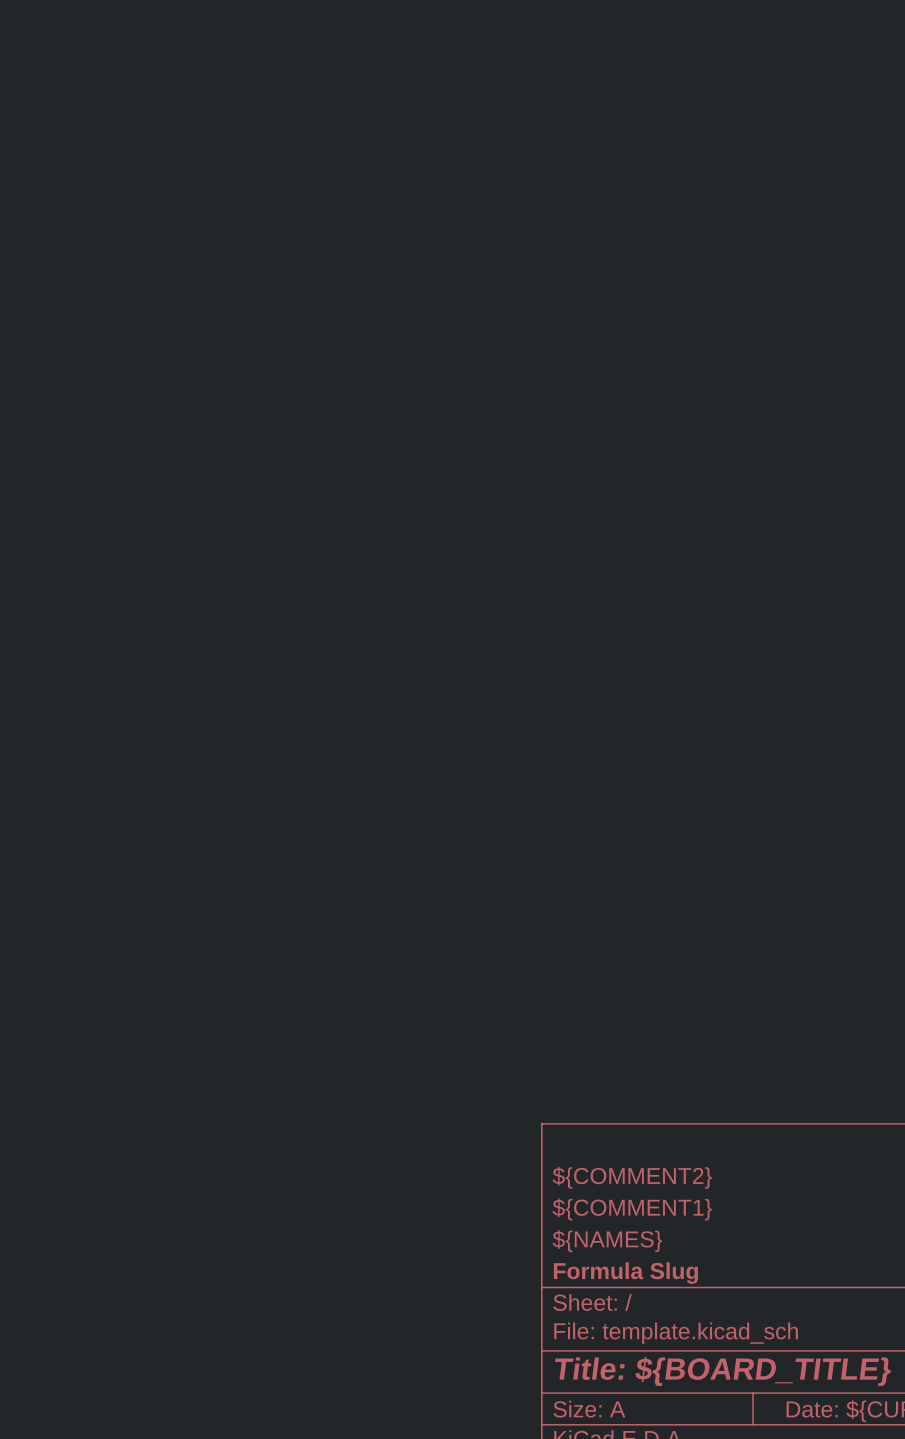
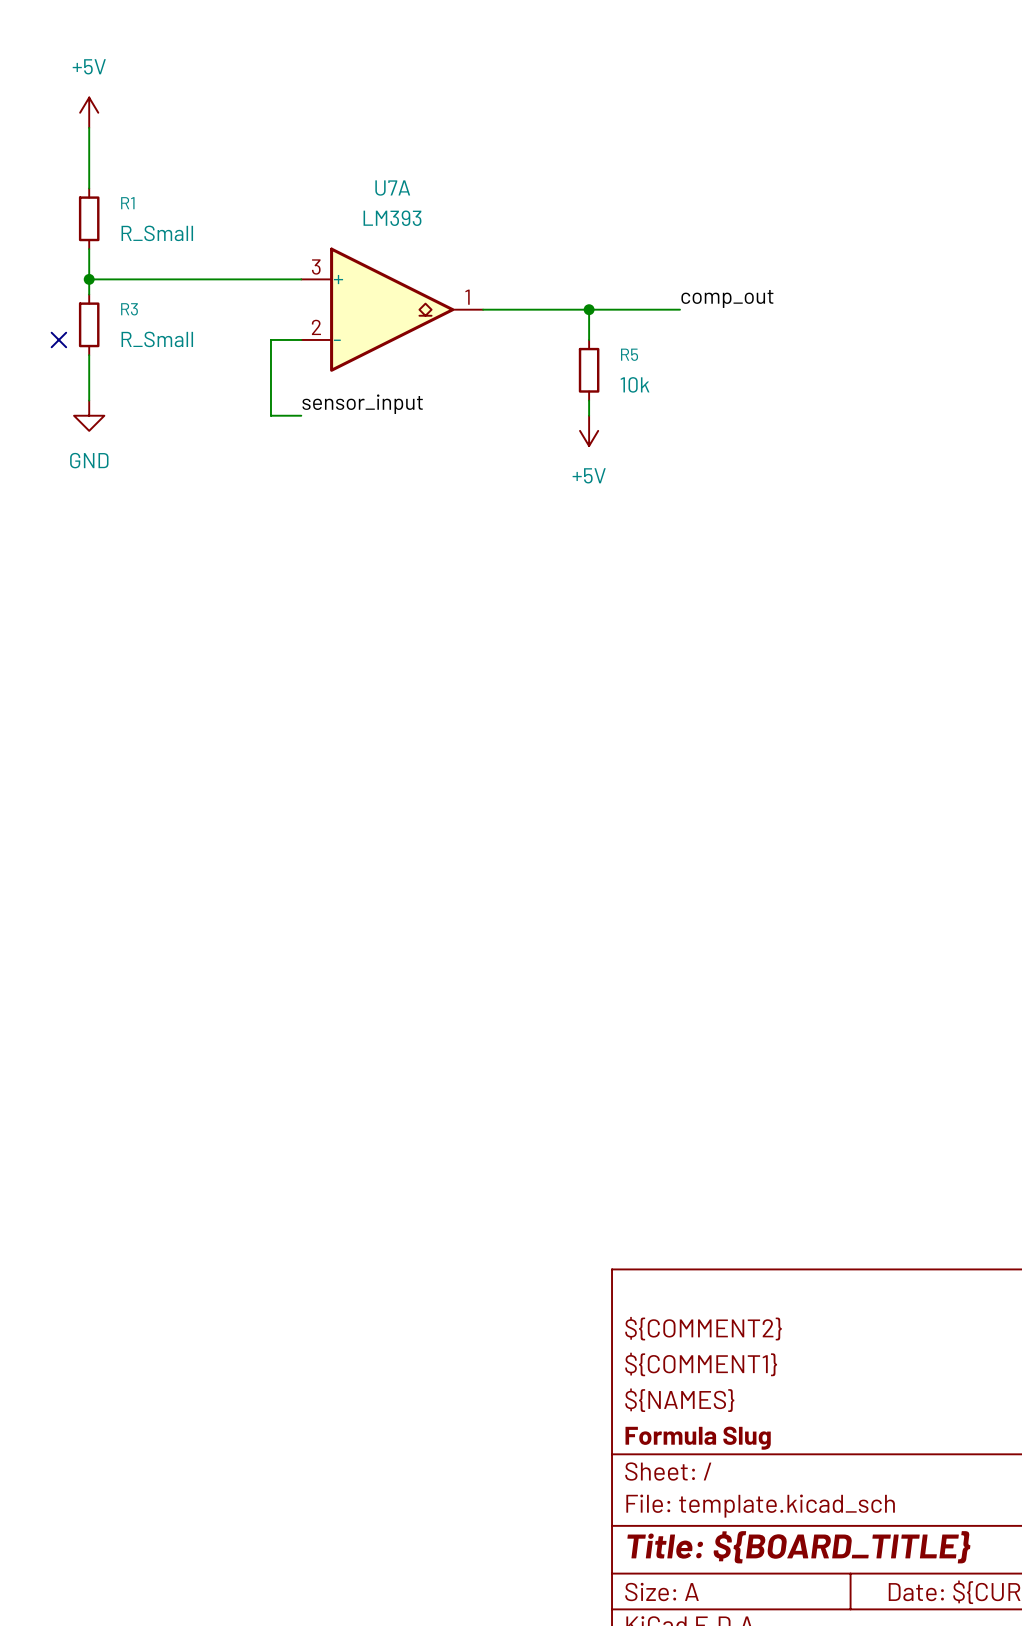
power symbol: none -> +5V (89, 112)
wire: none -> (89, 127) (89, 188)
R1: none -> R_Small (89, 218)
wire: none -> (89, 249) (89, 294)
wire: none -> (89, 279) (301, 279)
junction: none -> (89, 279)
label: none -> comp_out (727, 298)
U7A: none -> LM393 (392, 309)
wire: none -> (483, 309) (680, 309)
wire: none -> (589, 309) (589, 339)
junction: none -> (589, 309)
R3: none -> R_Small (89, 324)
no-connect mark: none -> (58, 339)
wire: none -> (301, 339) (270, 339) (270, 415) (301, 415)
wire: none -> (89, 355) (89, 400)
R5: none -> 10k (589, 370)
wire: none -> (589, 400) (589, 415)
label: none -> sensor_input (362, 404)
power symbol: none -> GND (89, 415)
power symbol: none -> +5V (589, 430)

